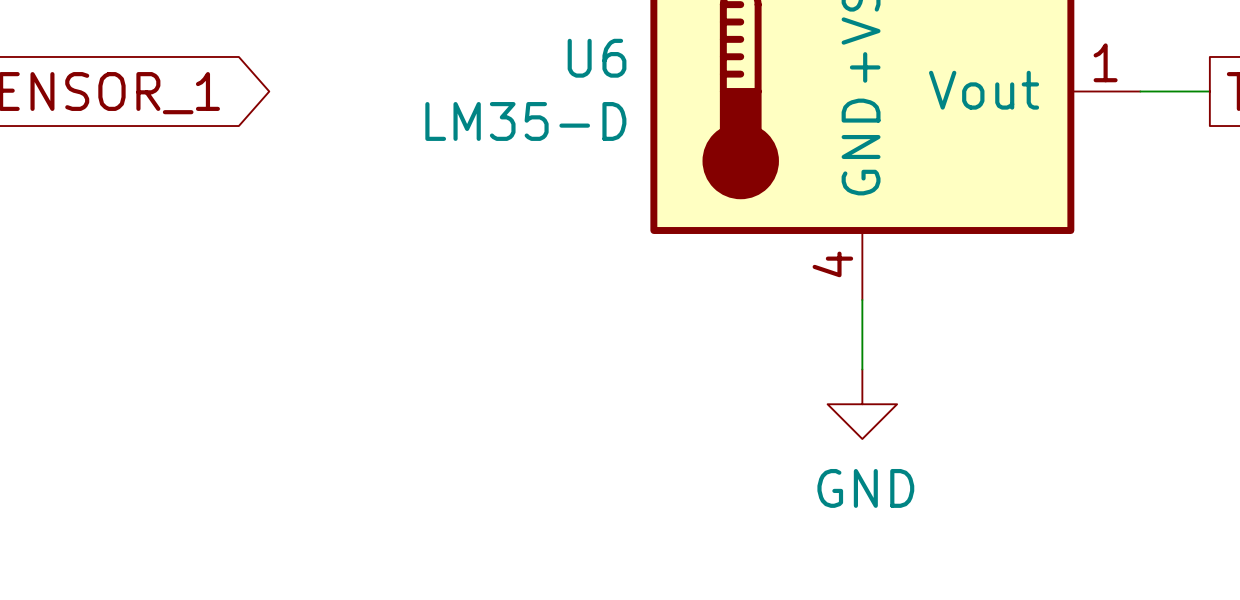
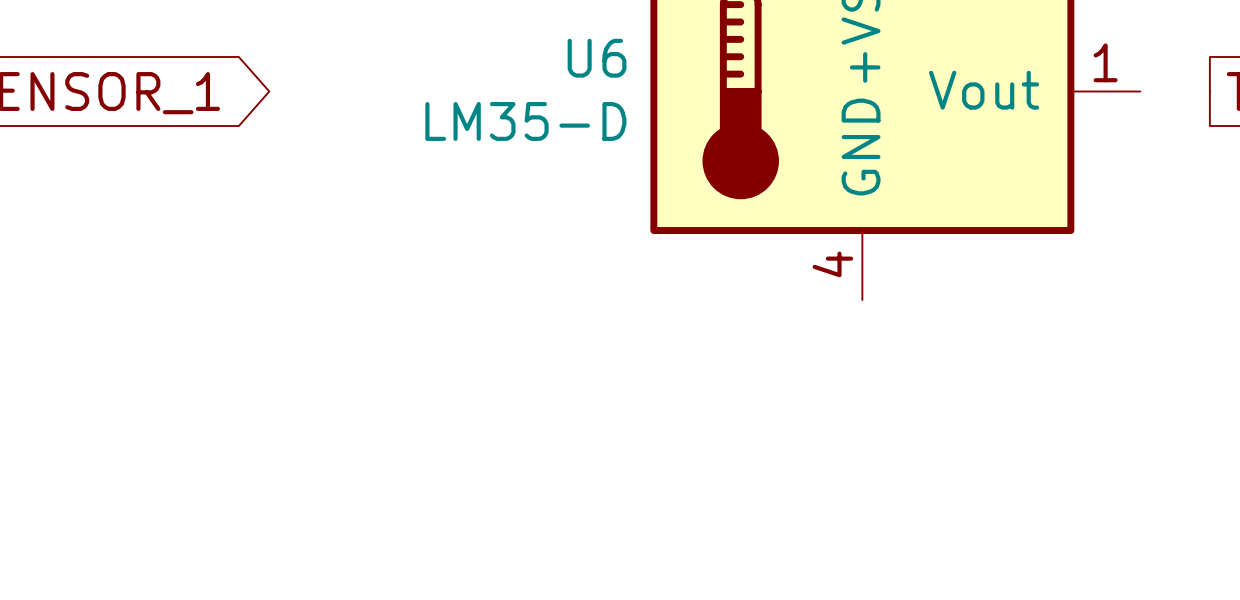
wire: (1140, 91) (1209, 91) -> none
wire: (862, 300) (862, 369) -> none
power symbol: GND (862, 404) -> none

